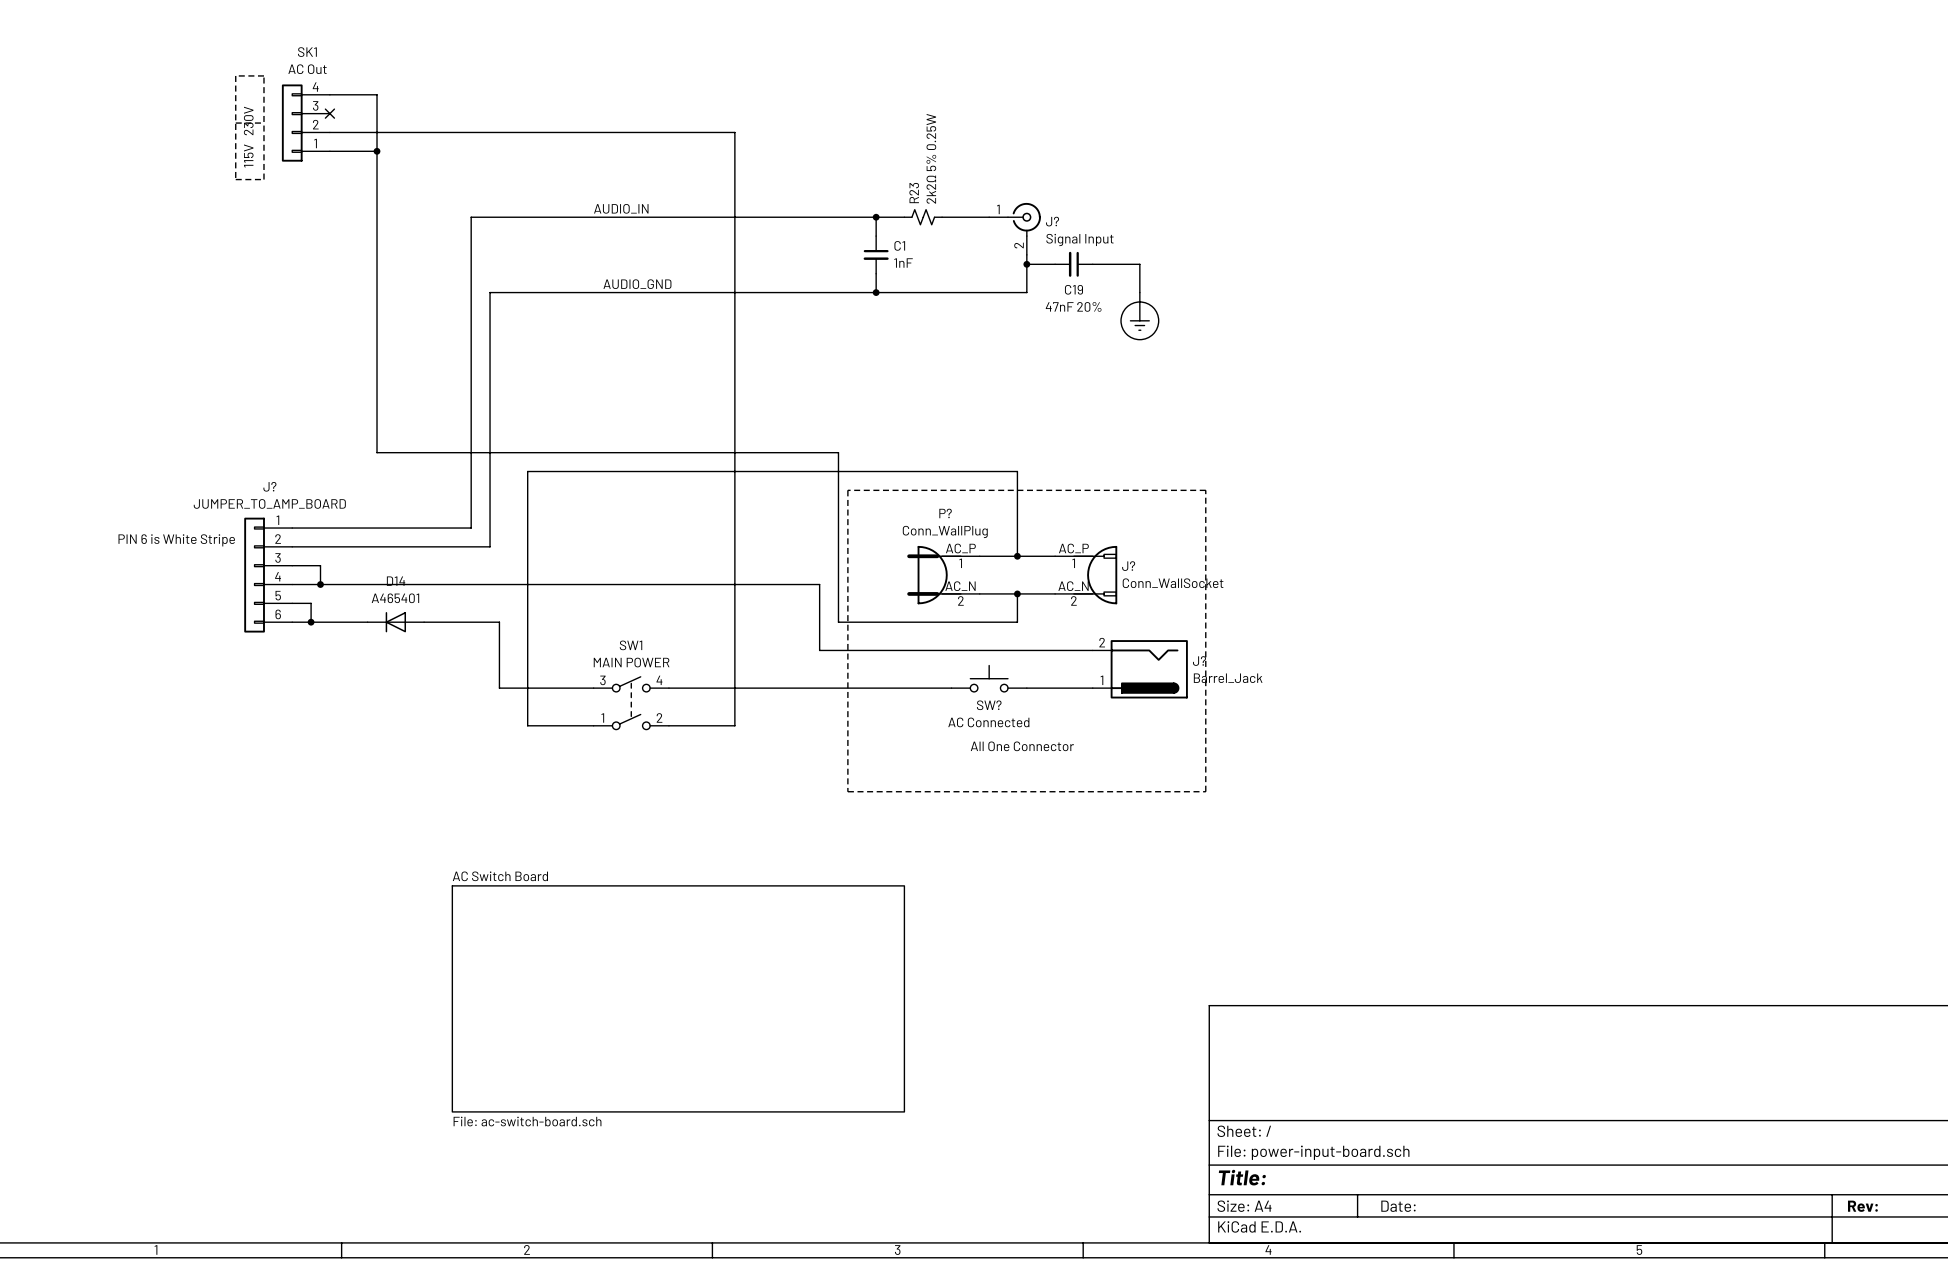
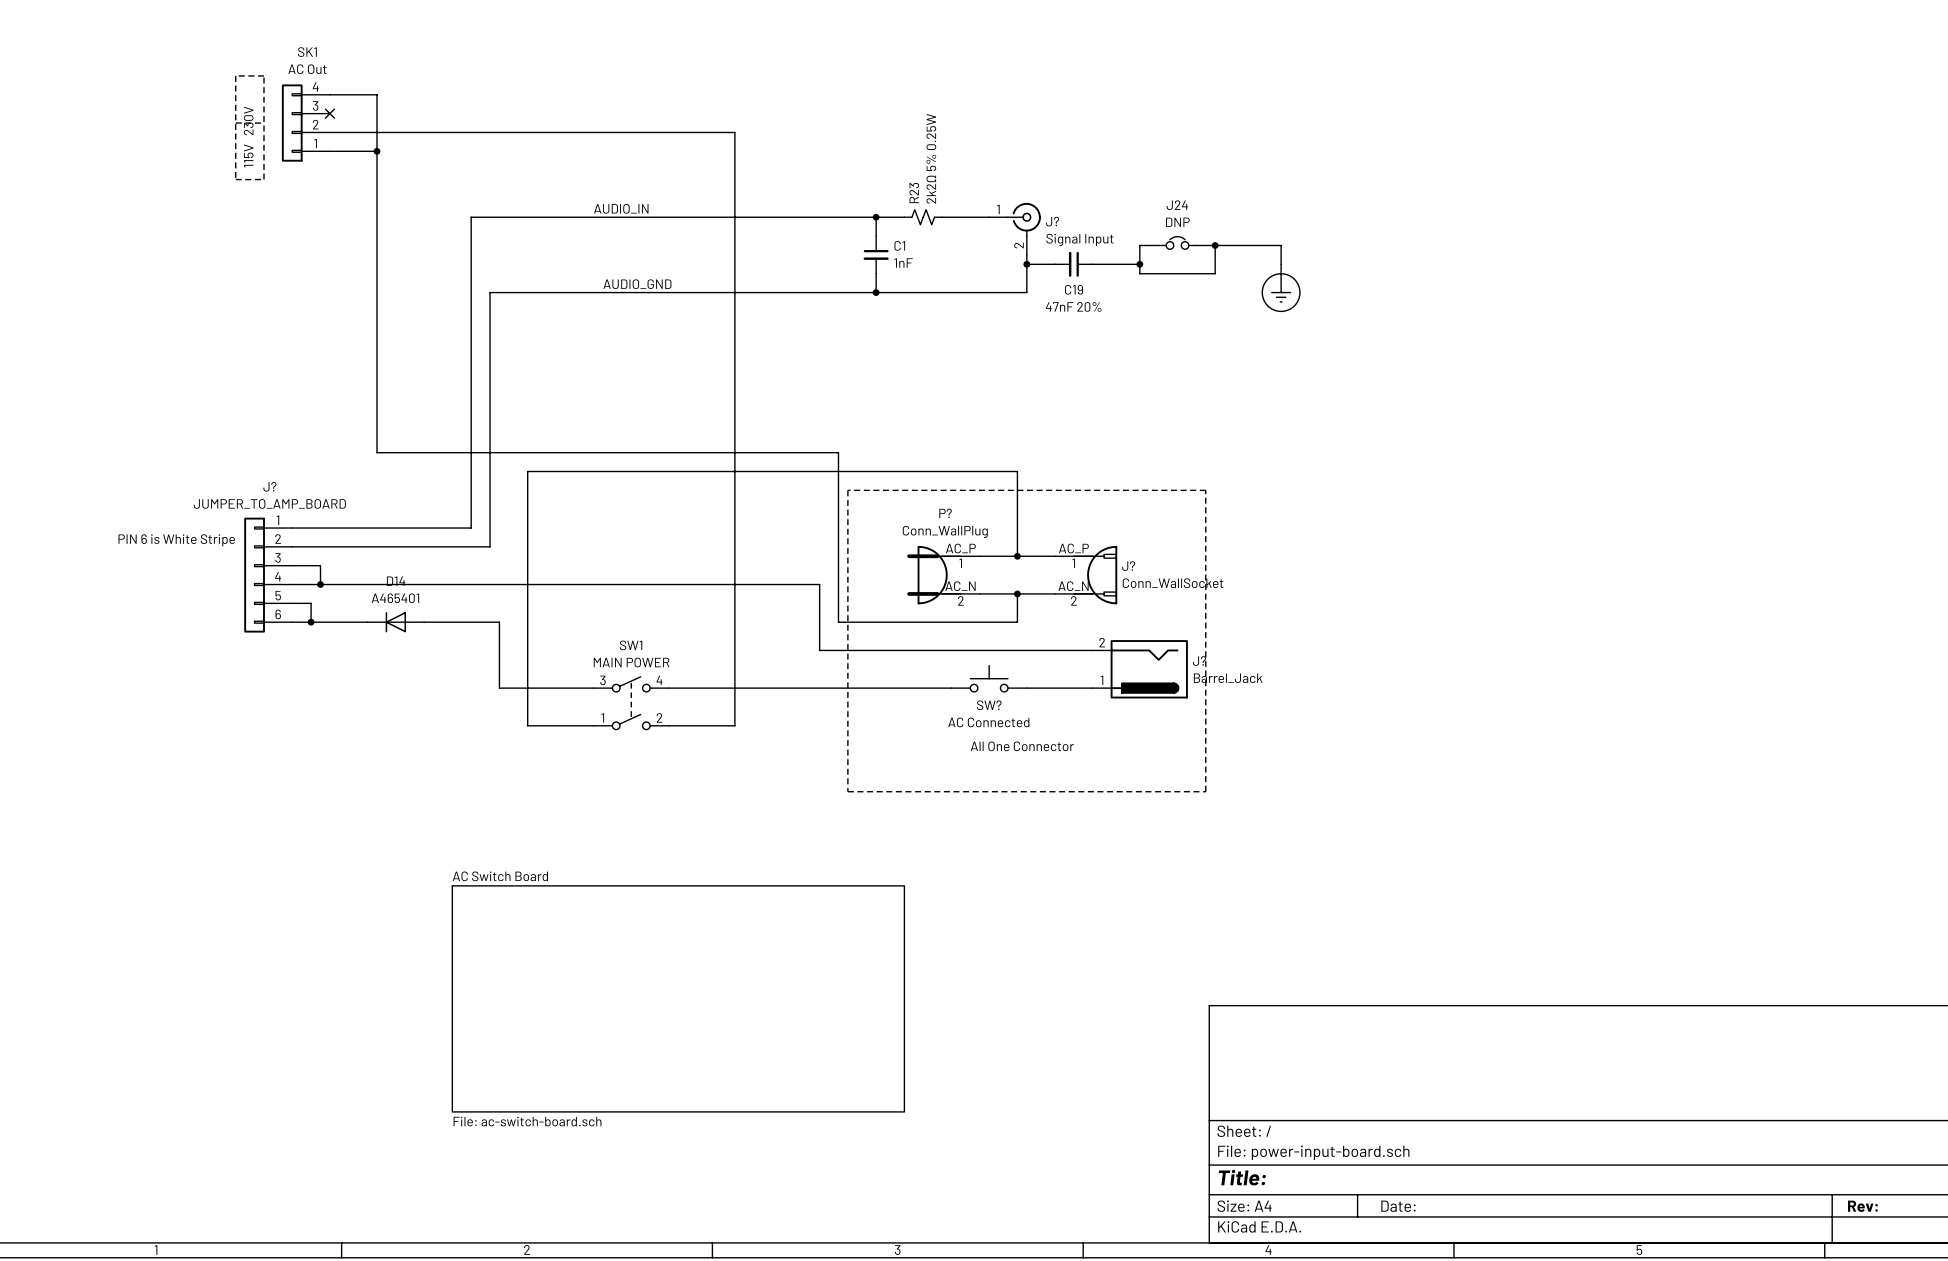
J24: none -> DNP (1177, 242)
wire: none -> (1158, 245) (1139, 245) (1139, 264)
wire: none -> (1196, 245) (1281, 245) (1281, 264)
junction: none -> (1215, 245)
junction: none -> (1139, 264)
wire: (1139, 273) (1139, 292) -> (1139, 273) (1215, 273) (1215, 245)
power symbol position: (1139, 316) -> (1281, 287)

